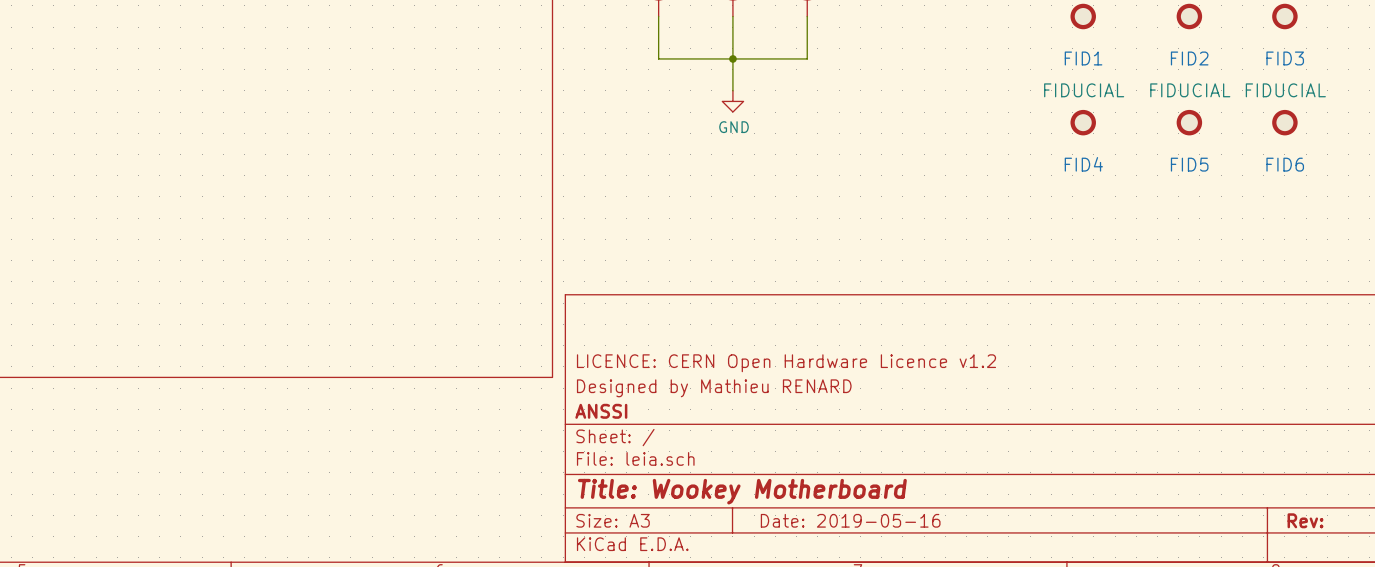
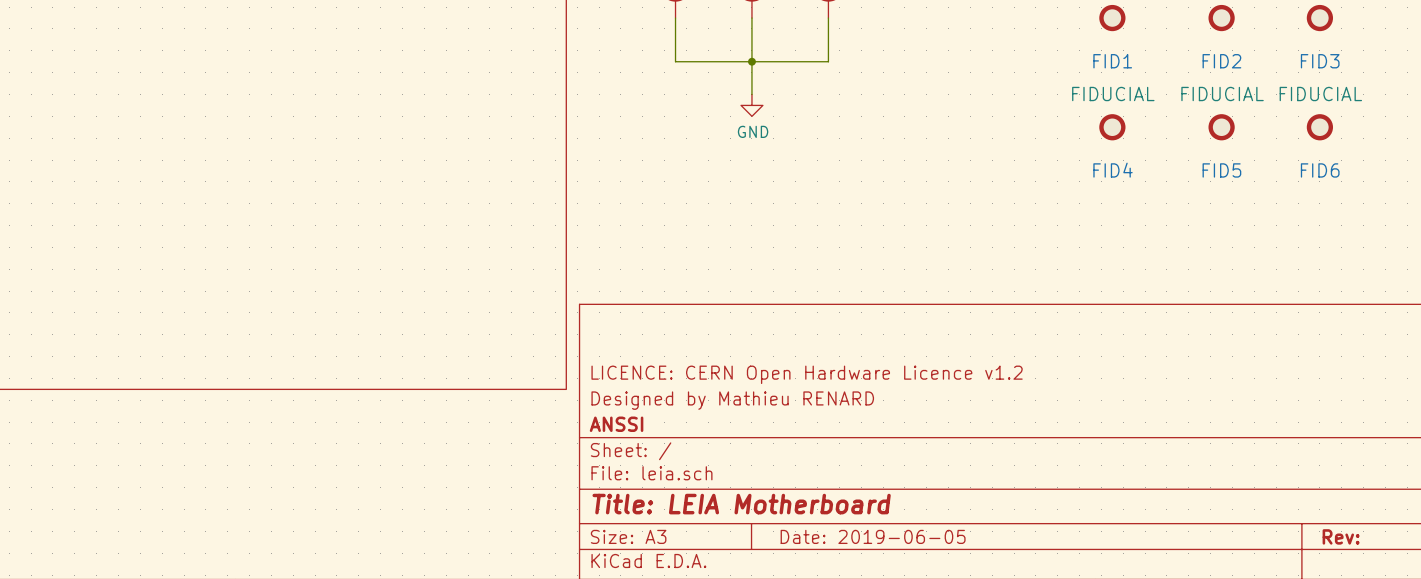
title block: Title: Wookey Motherboard (742, 491) -> Title: LEIA Motherboard (741, 504)
title block: Date: 2019-05-16 (850, 520) -> Date: 2019-06-05 (873, 536)

